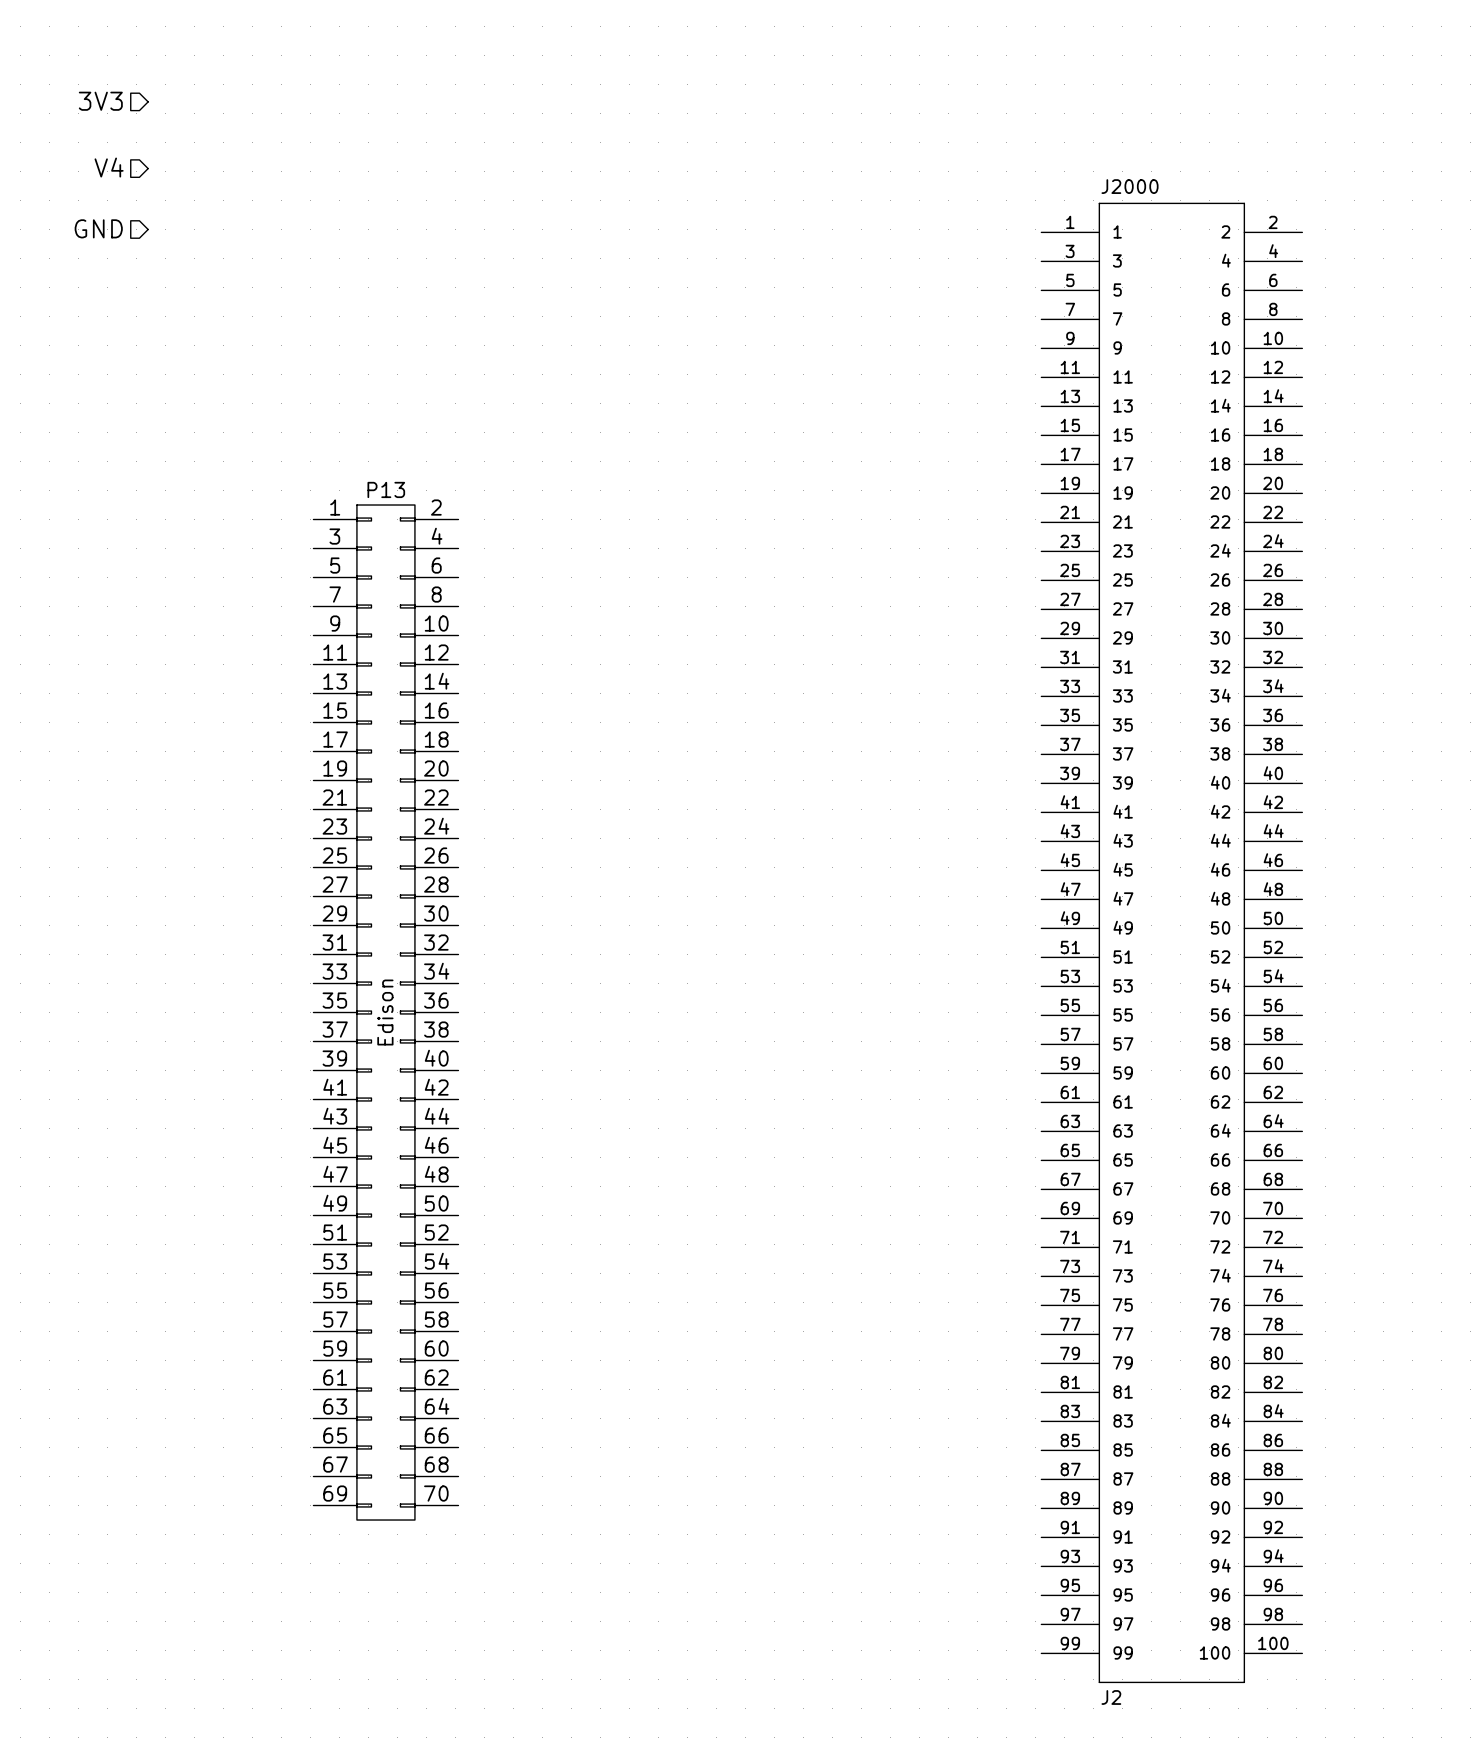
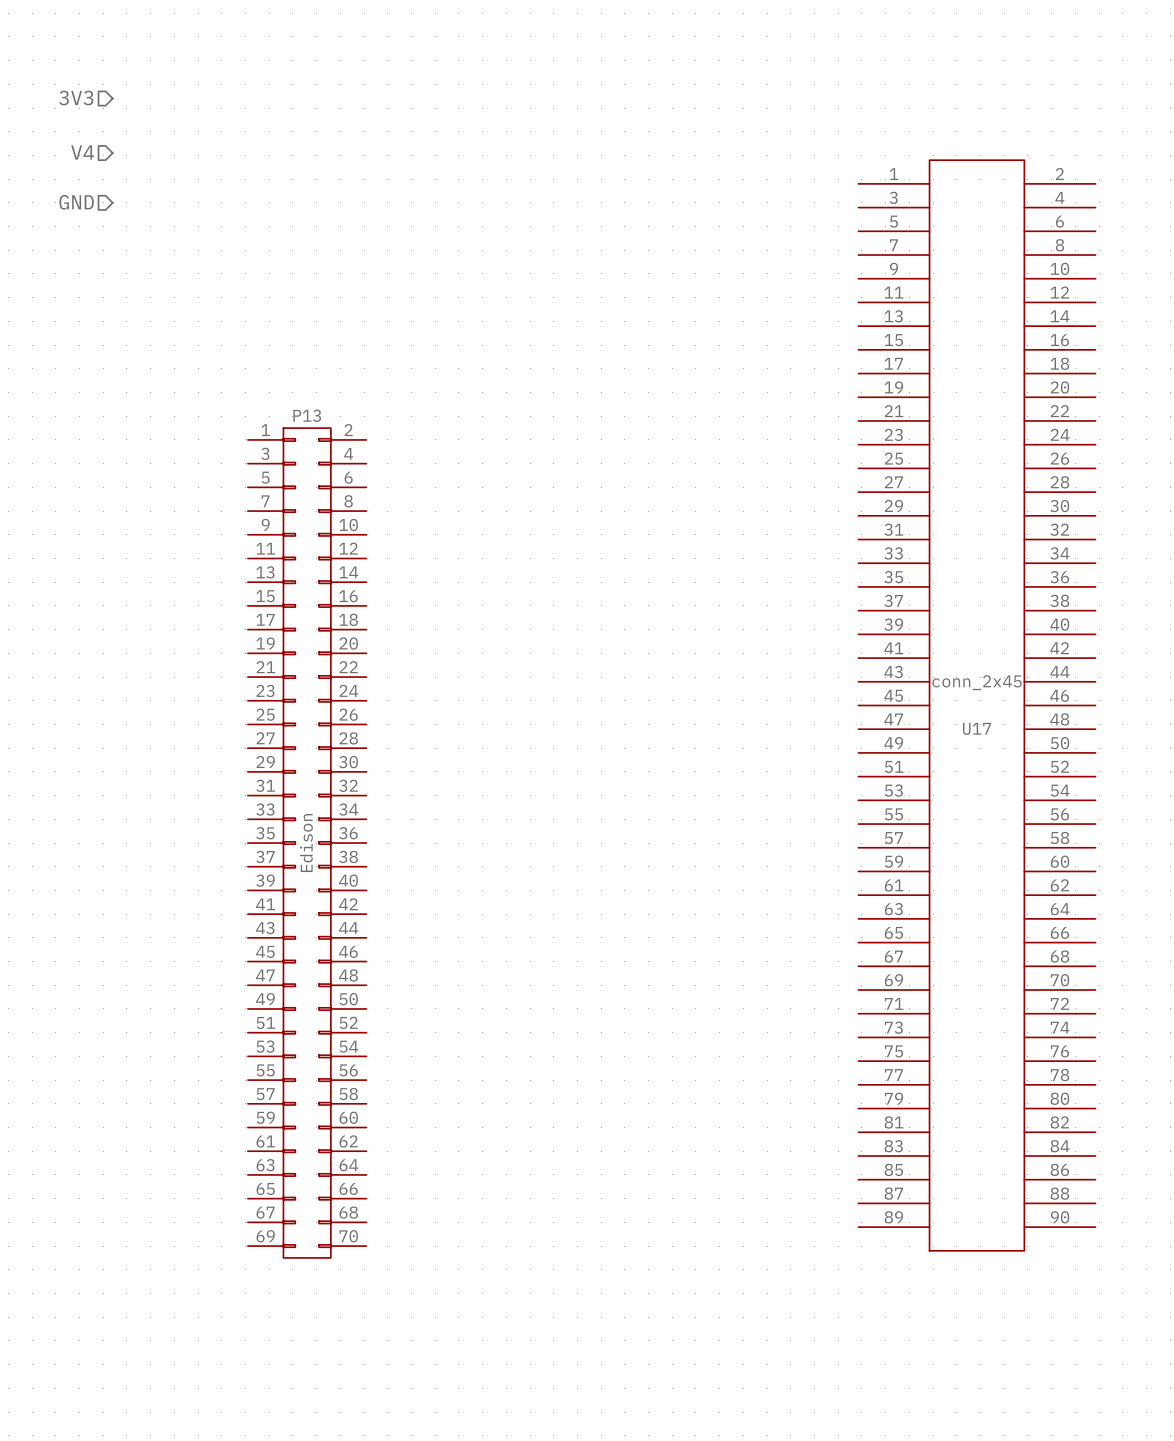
U17: none -> conn_2x45 (976, 705)
J2: J2000 (1171, 942) -> none

